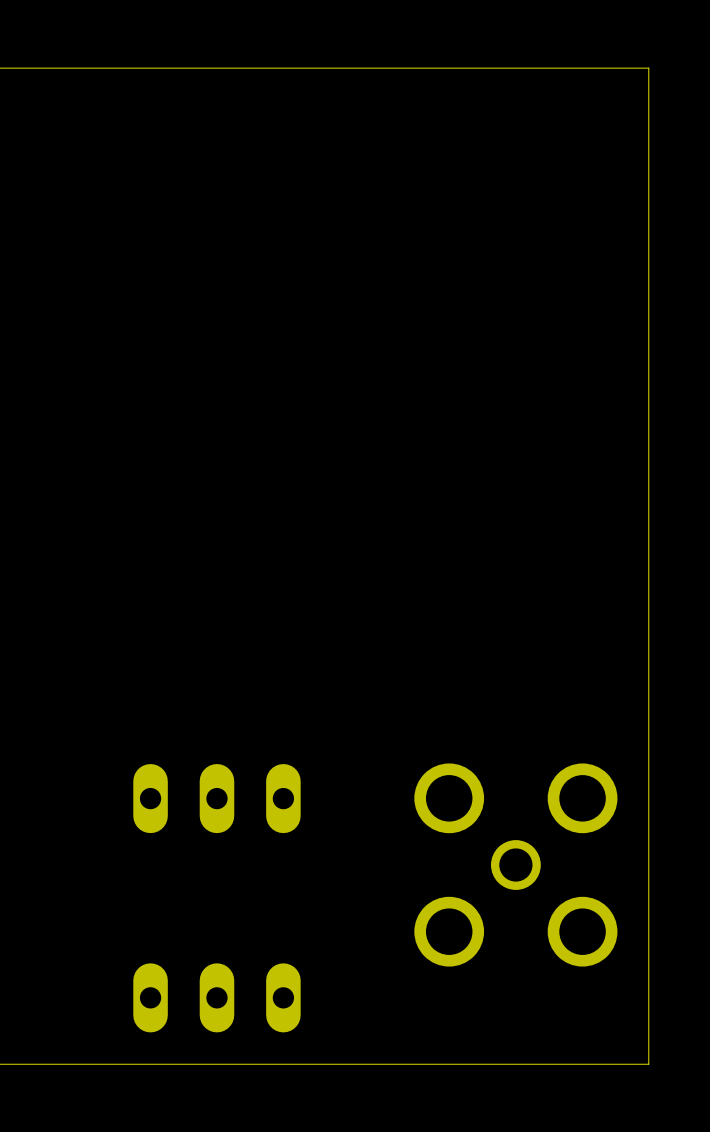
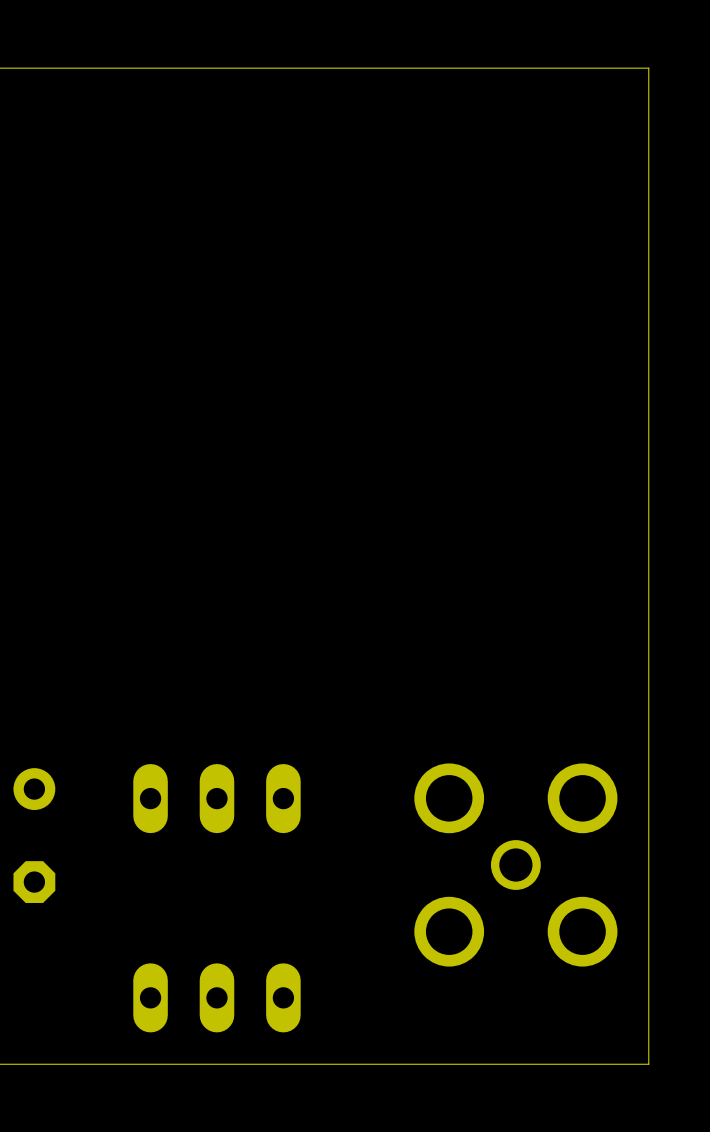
part: none -> (34, 835)

